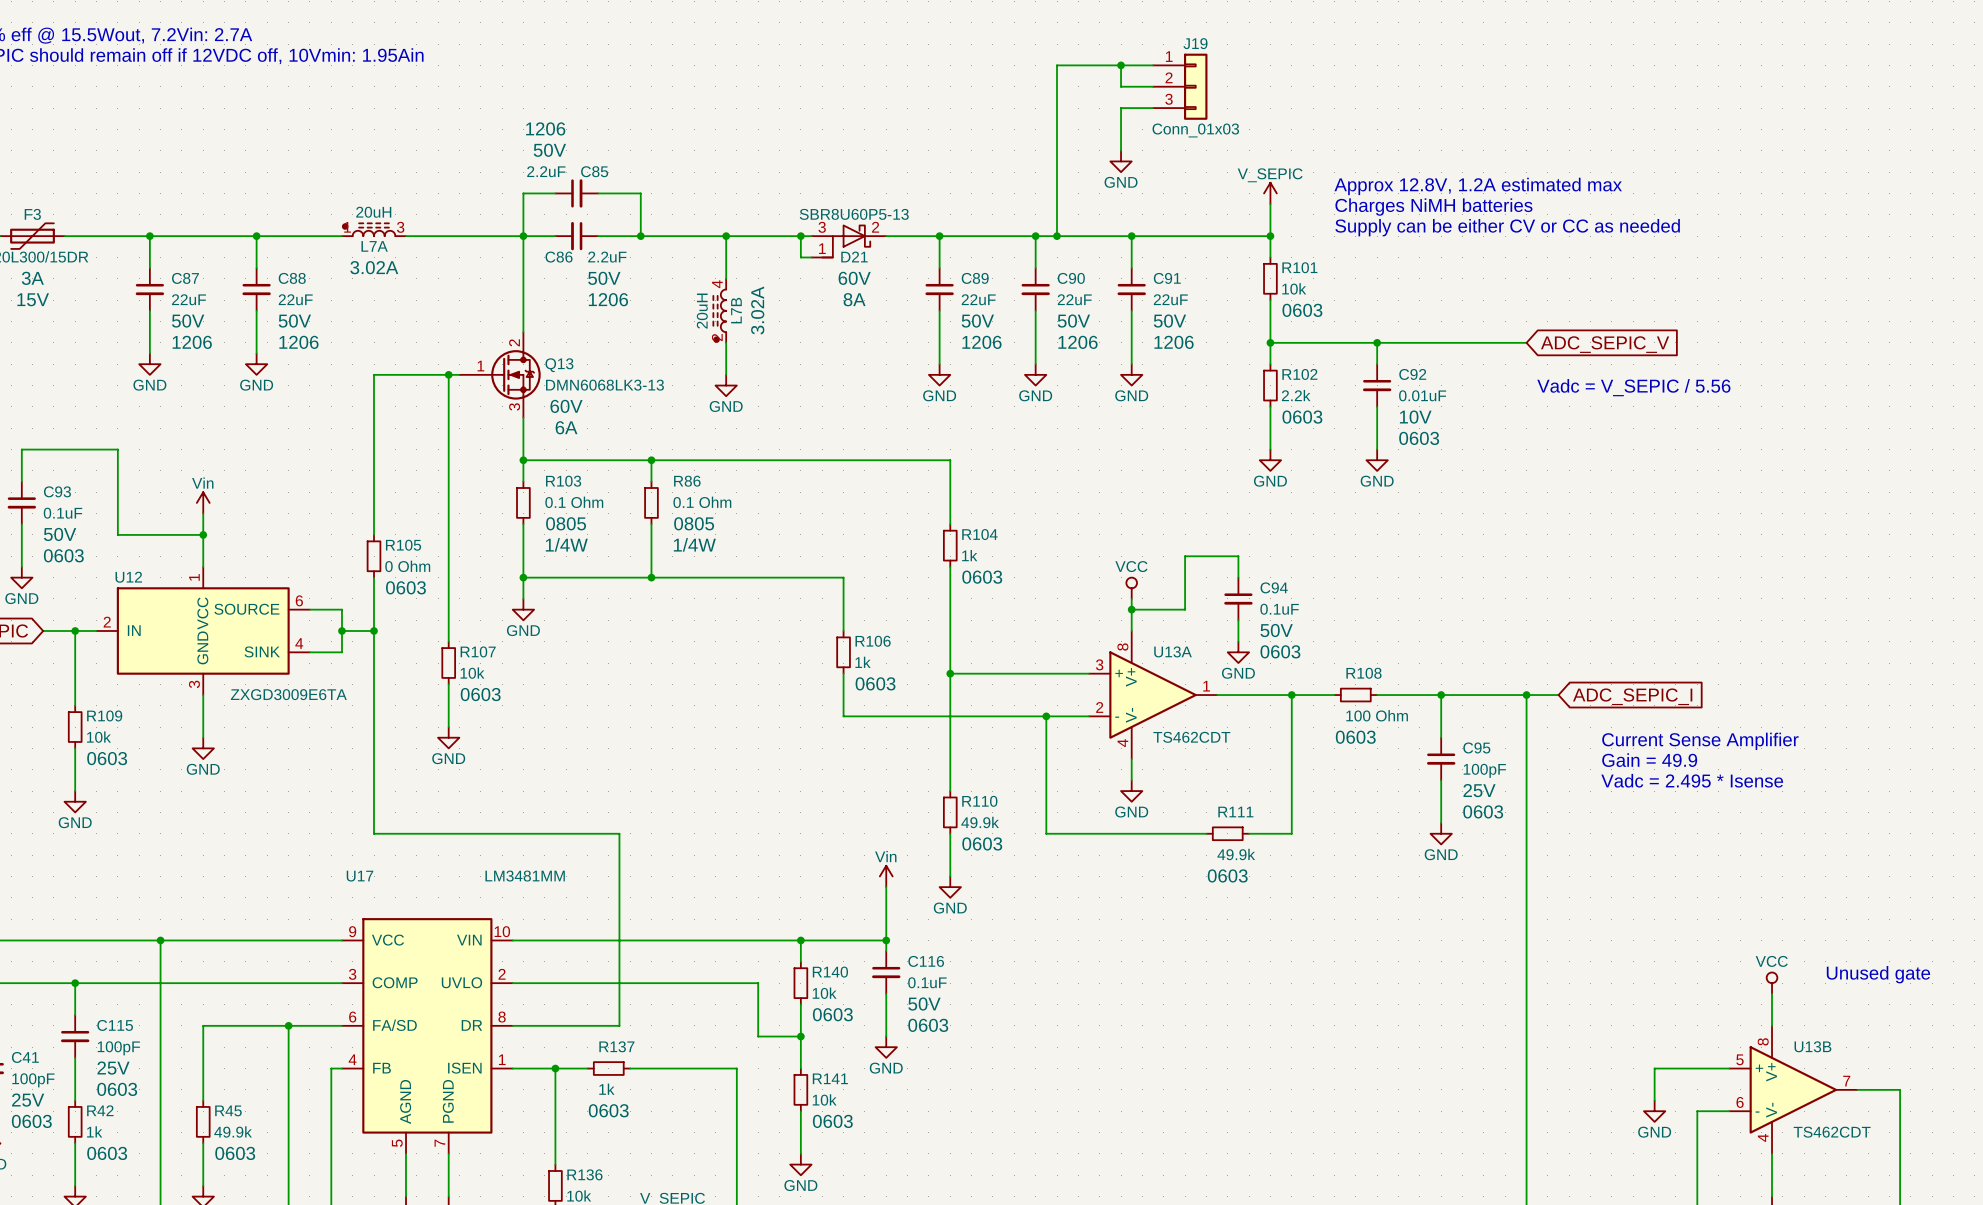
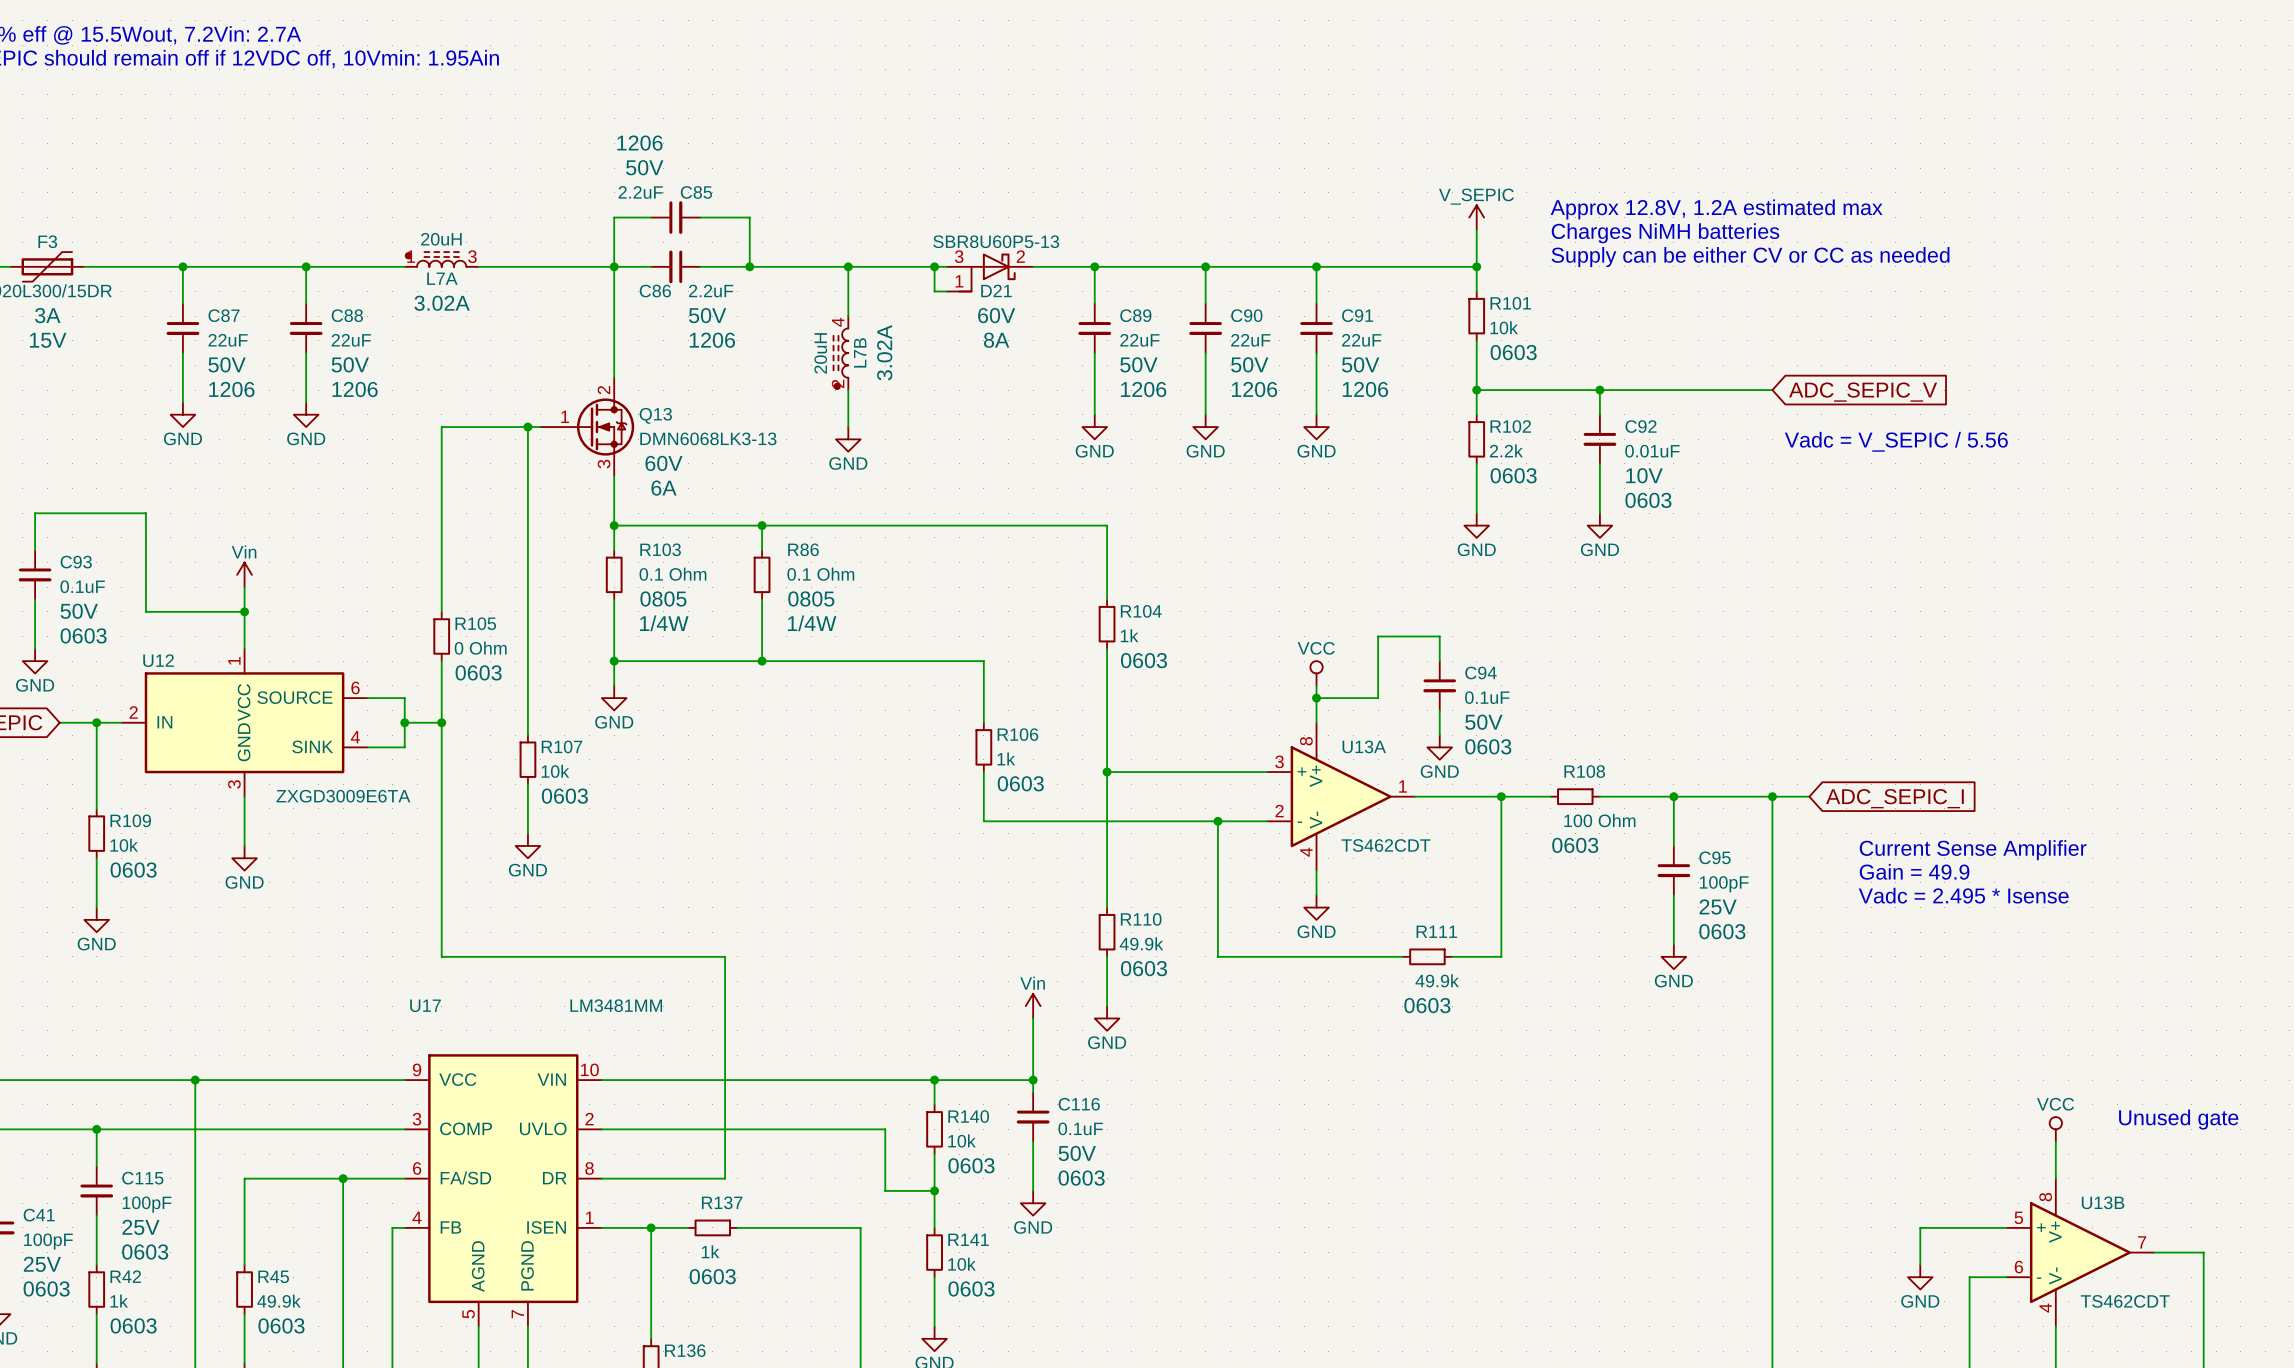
wire: (1121, 65) (1121, 86) (1153, 86) -> none
junction: (1121, 65) -> none
wire: (1153, 65) (1057, 65) (1057, 236) -> none
J19: Conn_01x03 (1180, 86) -> none
wire: (1153, 108) (1121, 108) (1121, 150) -> none
power symbol: GND (1121, 161) -> none
junction: (1057, 236) -> none

